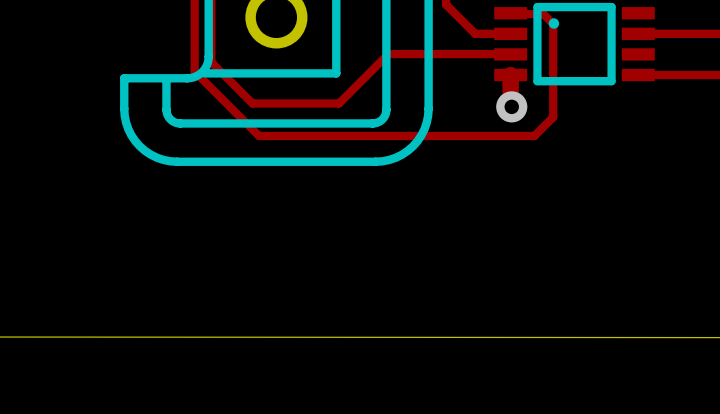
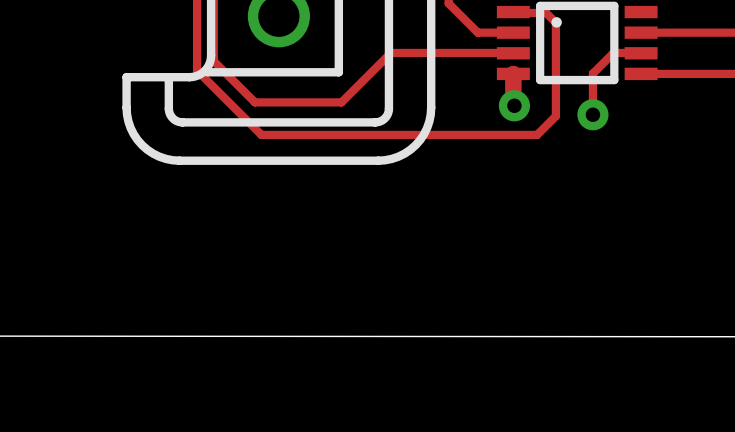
track: none -> (641, 52) (613, 52) (592, 73) (592, 114)
via: none -> (592, 114)

